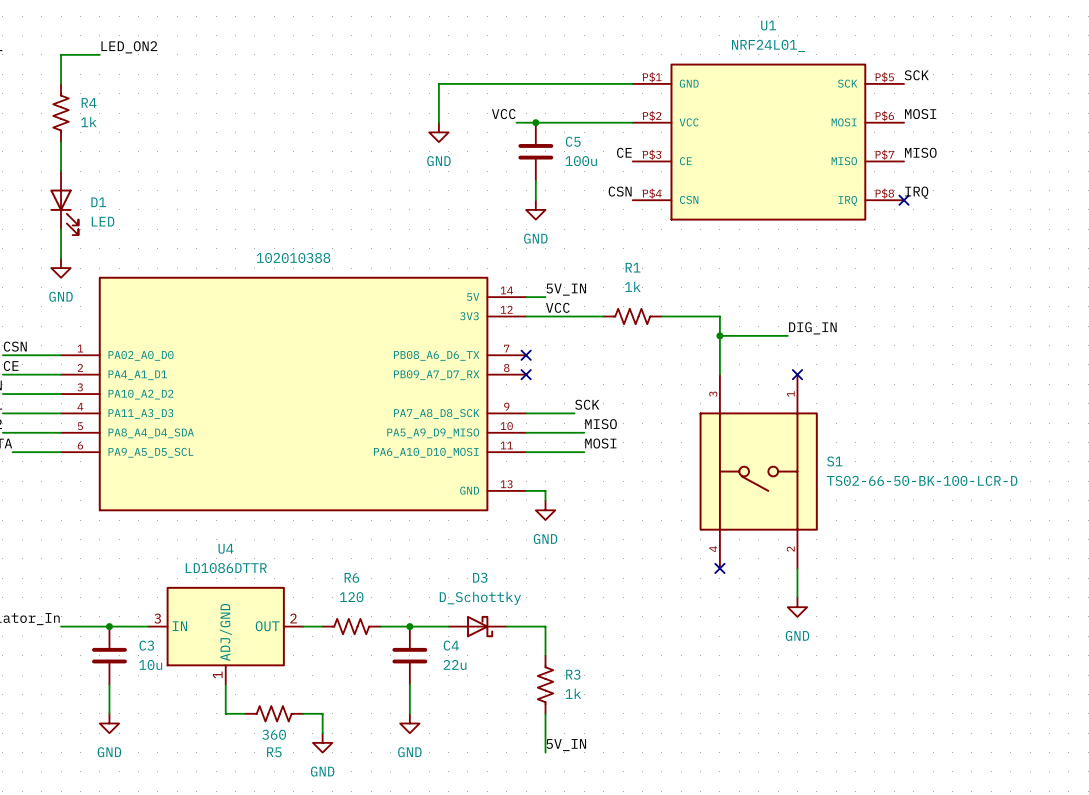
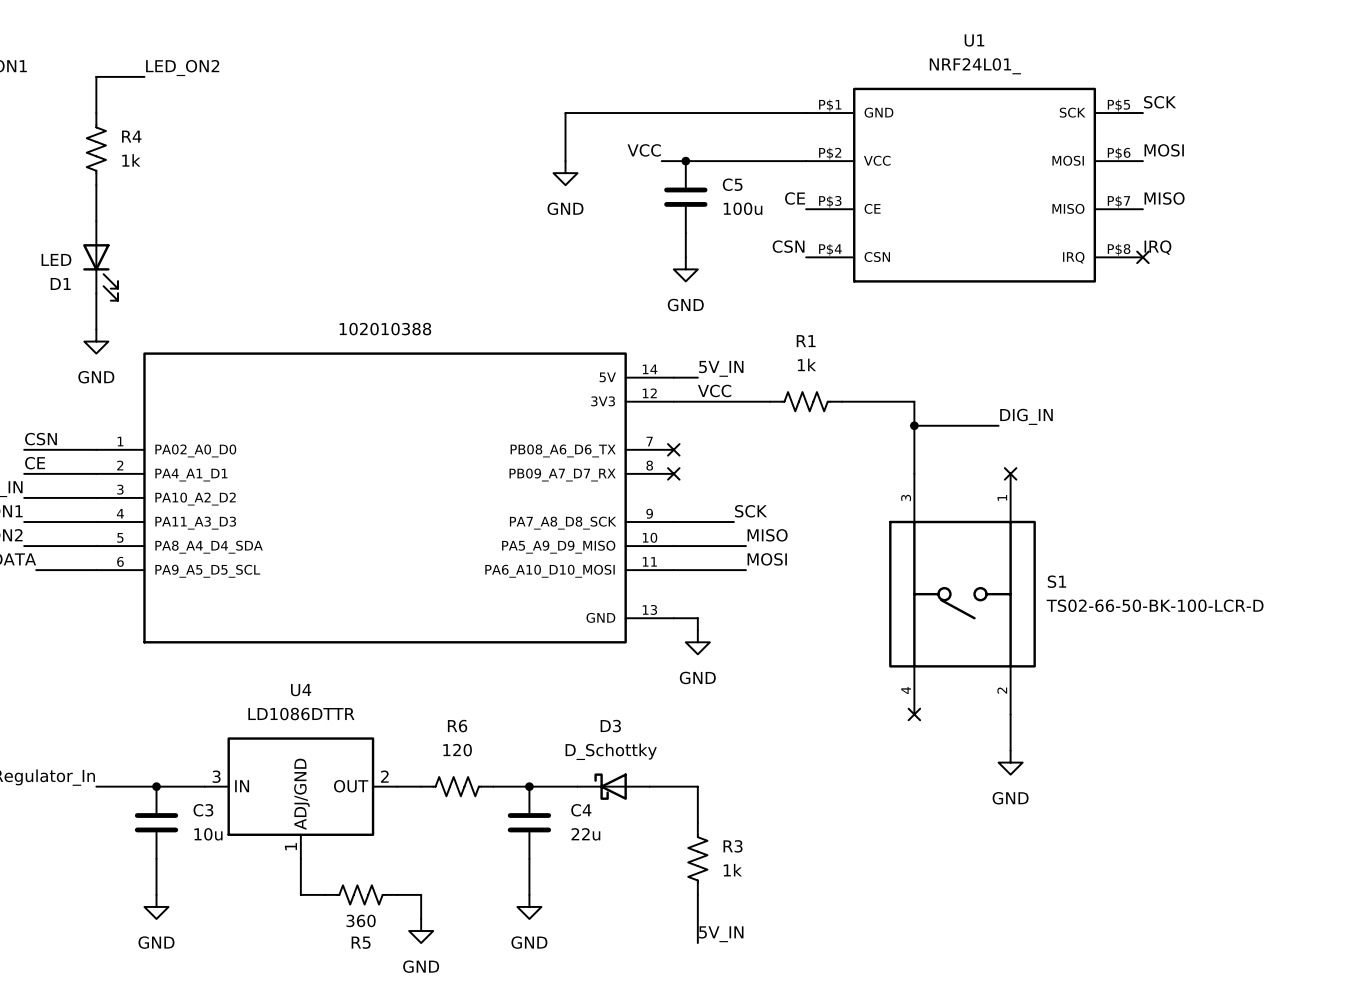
D1 name position: D1 (98, 202) -> D1 (60, 283)
D1 value position: LED (103, 221) -> LED (56, 259)
D3 rotation: 0° (480, 626) -> 180° (610, 786)

